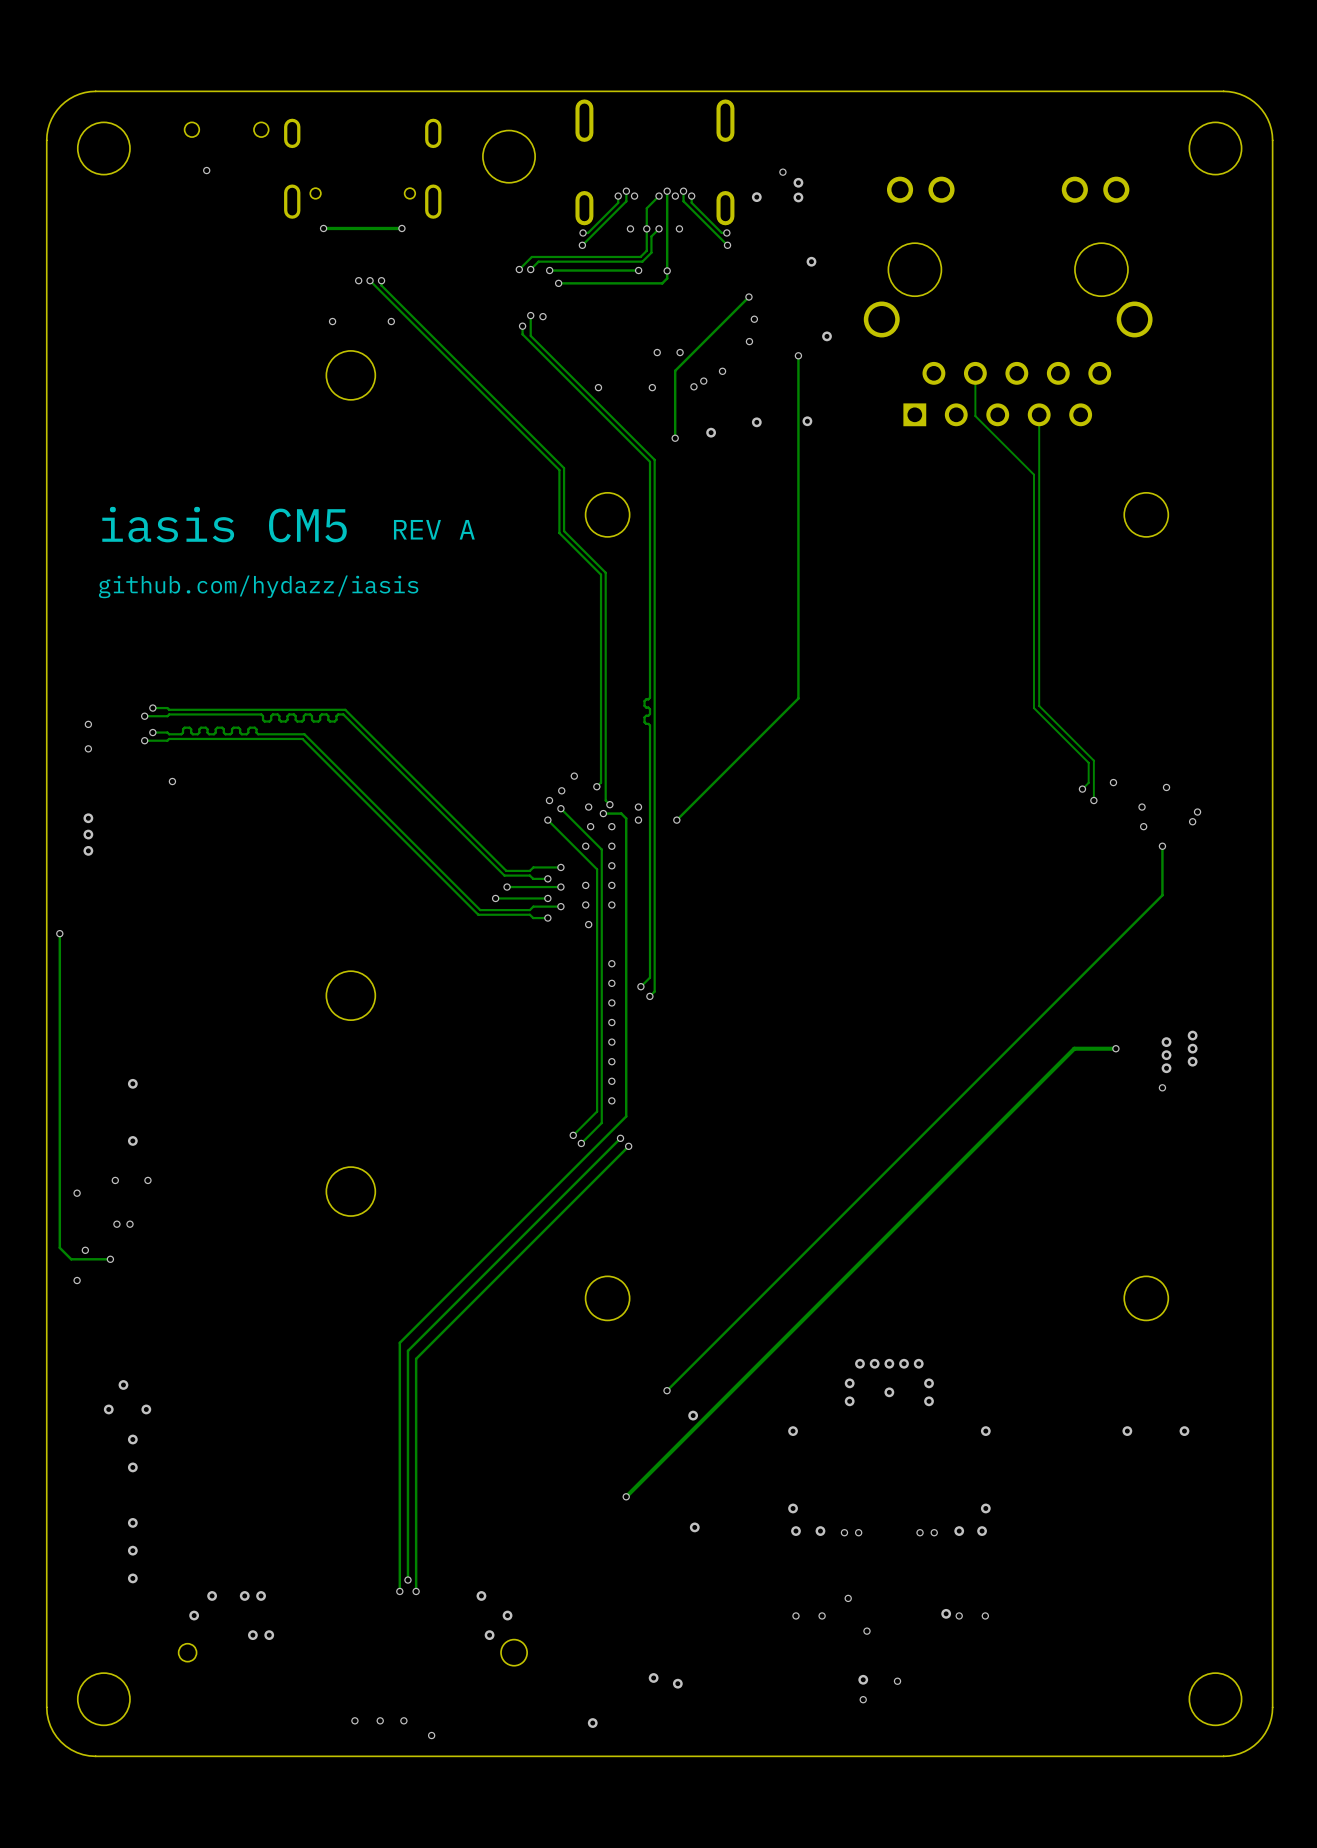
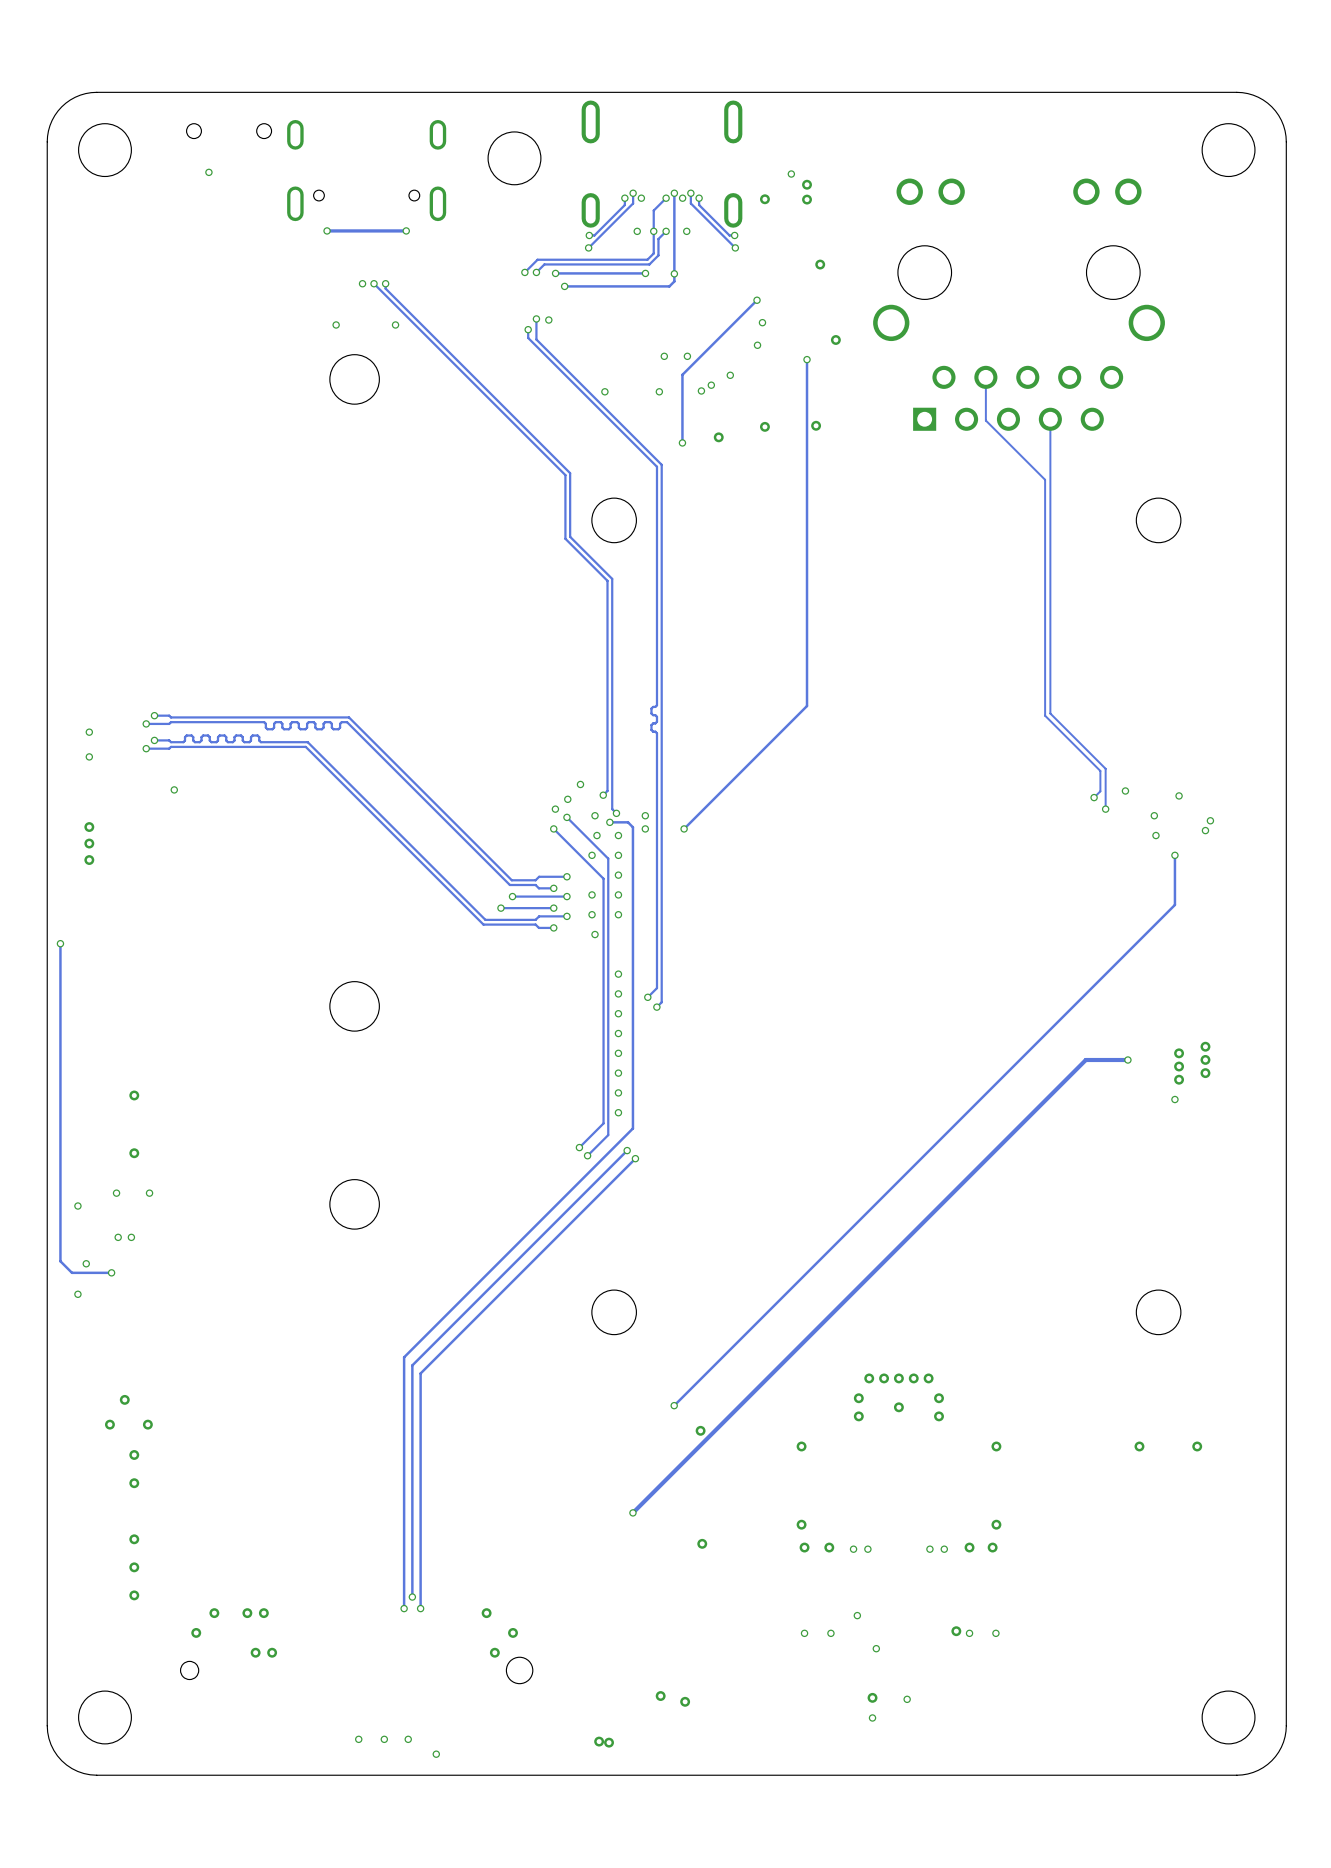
text: iasis CM5 (224, 524) -> none
text: REV A (434, 529) -> none
text: github.com/hydazz/iasis (258, 586) -> none
via: none -> (609, 1742)

